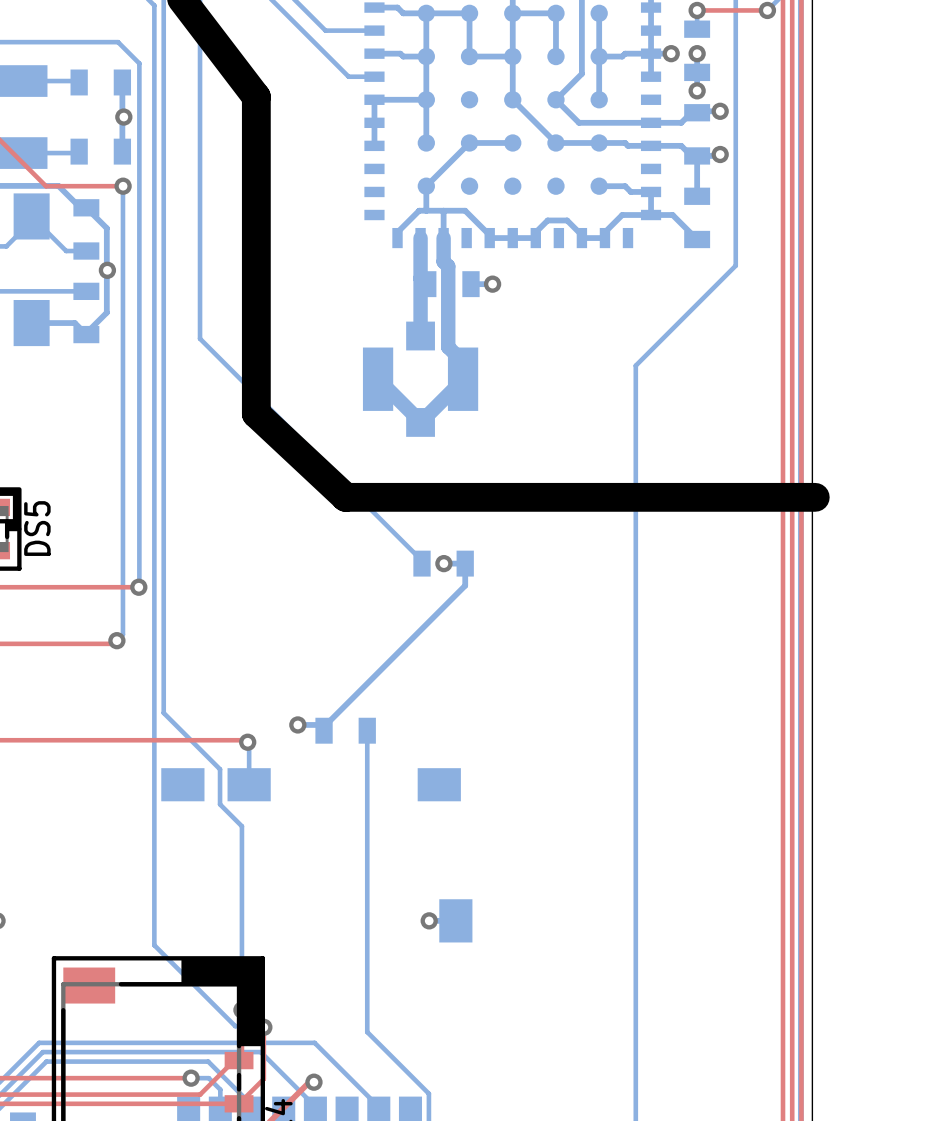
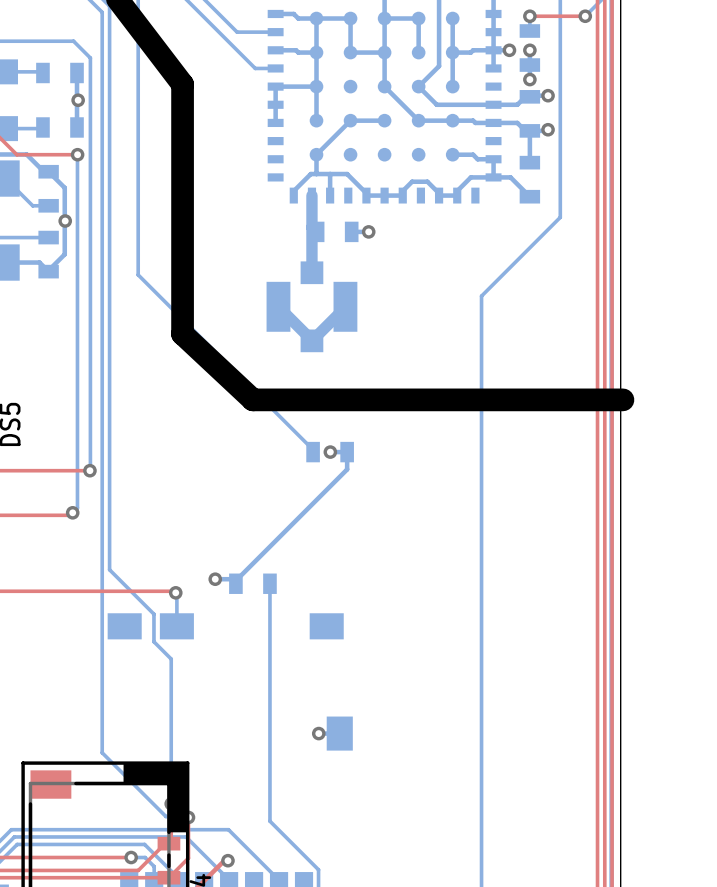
bottom track: (443, 238) (443, 261) (448, 266) (448, 347) (463, 361) (463, 379) -> none

